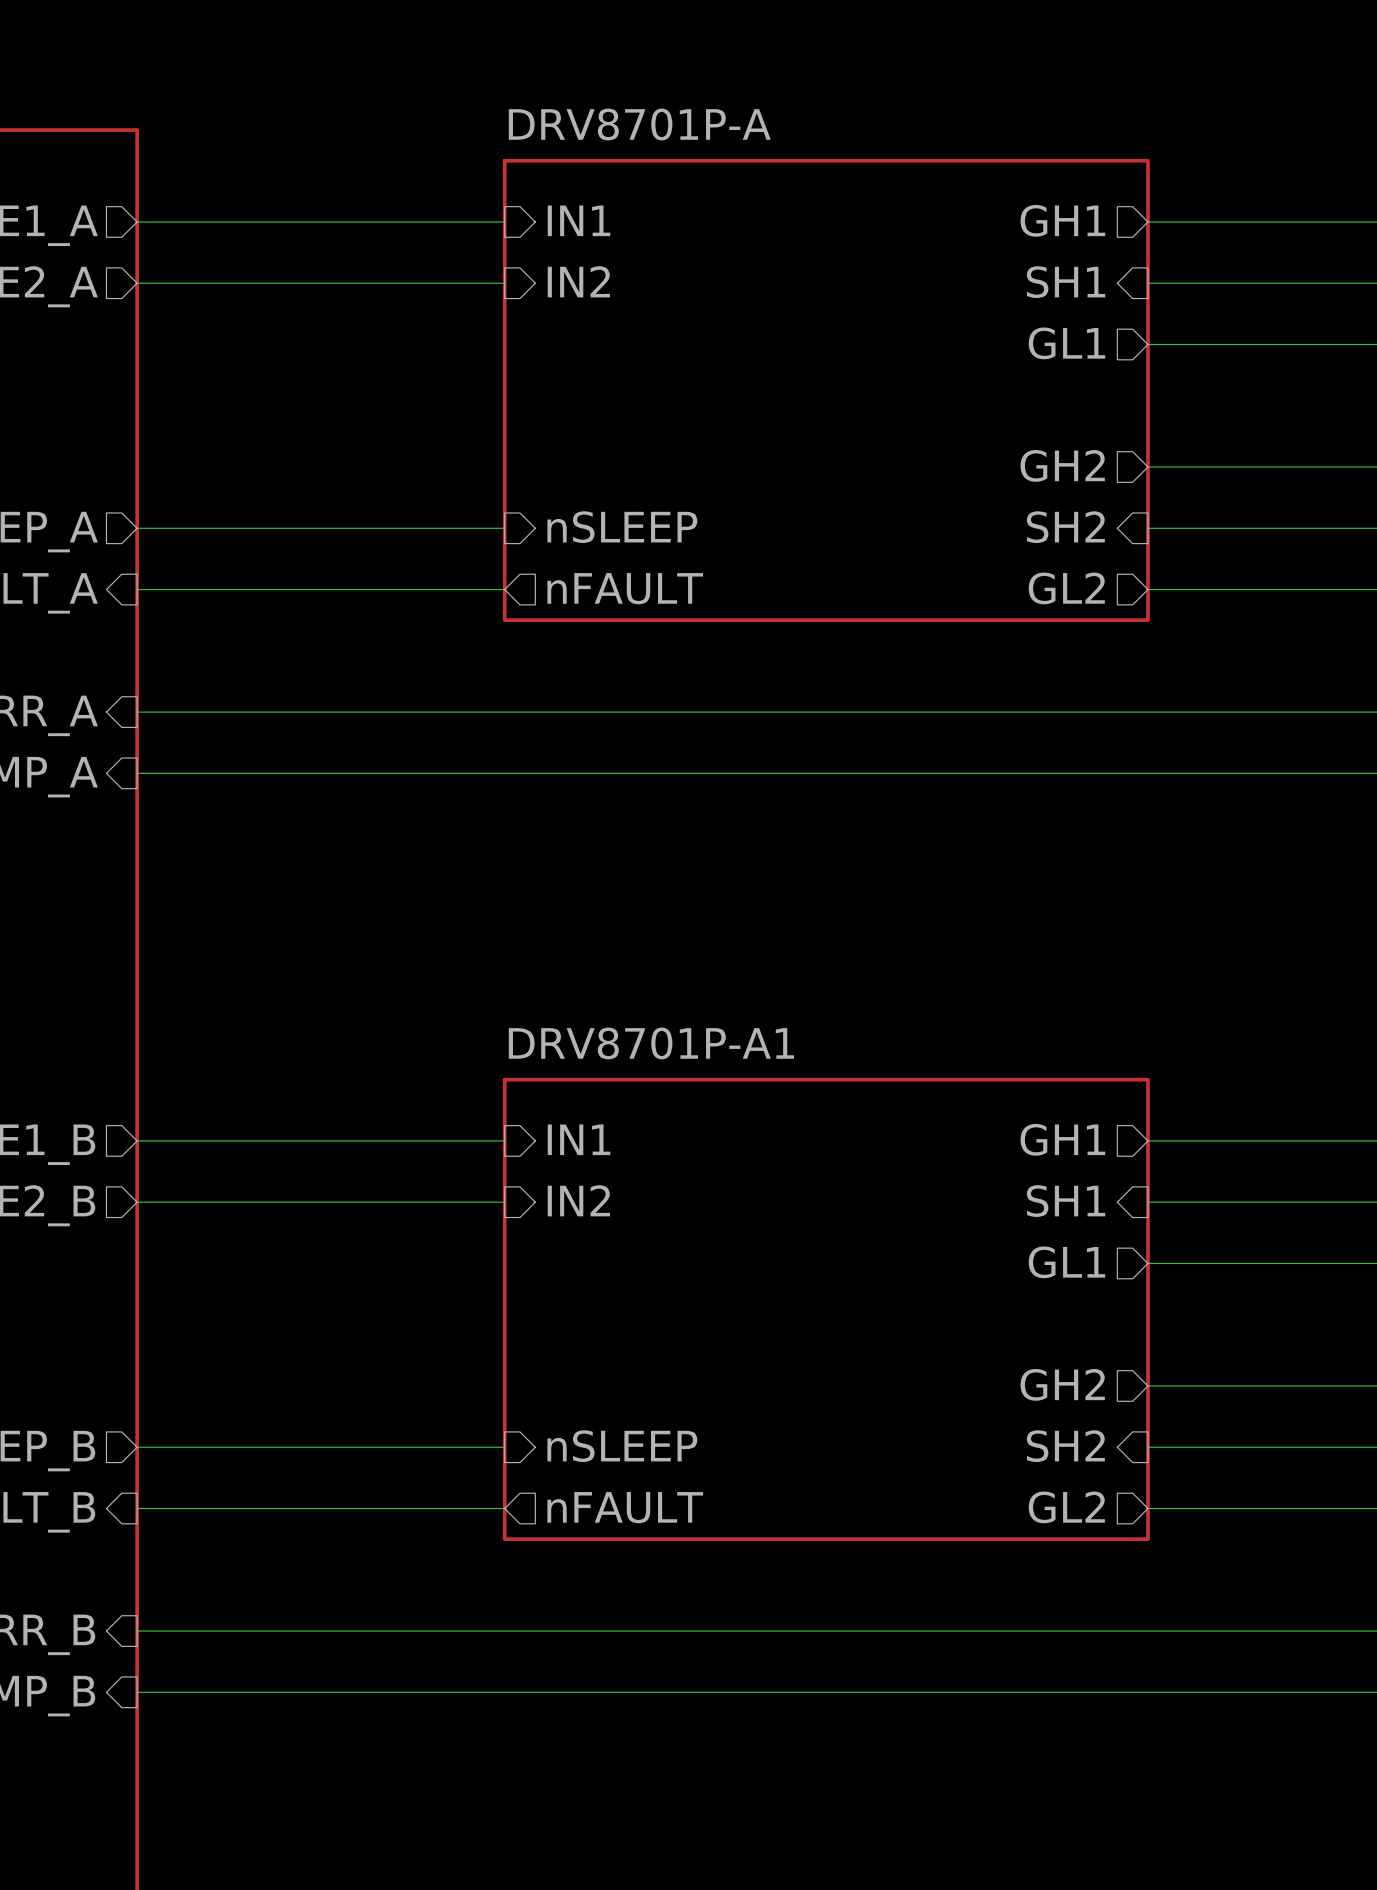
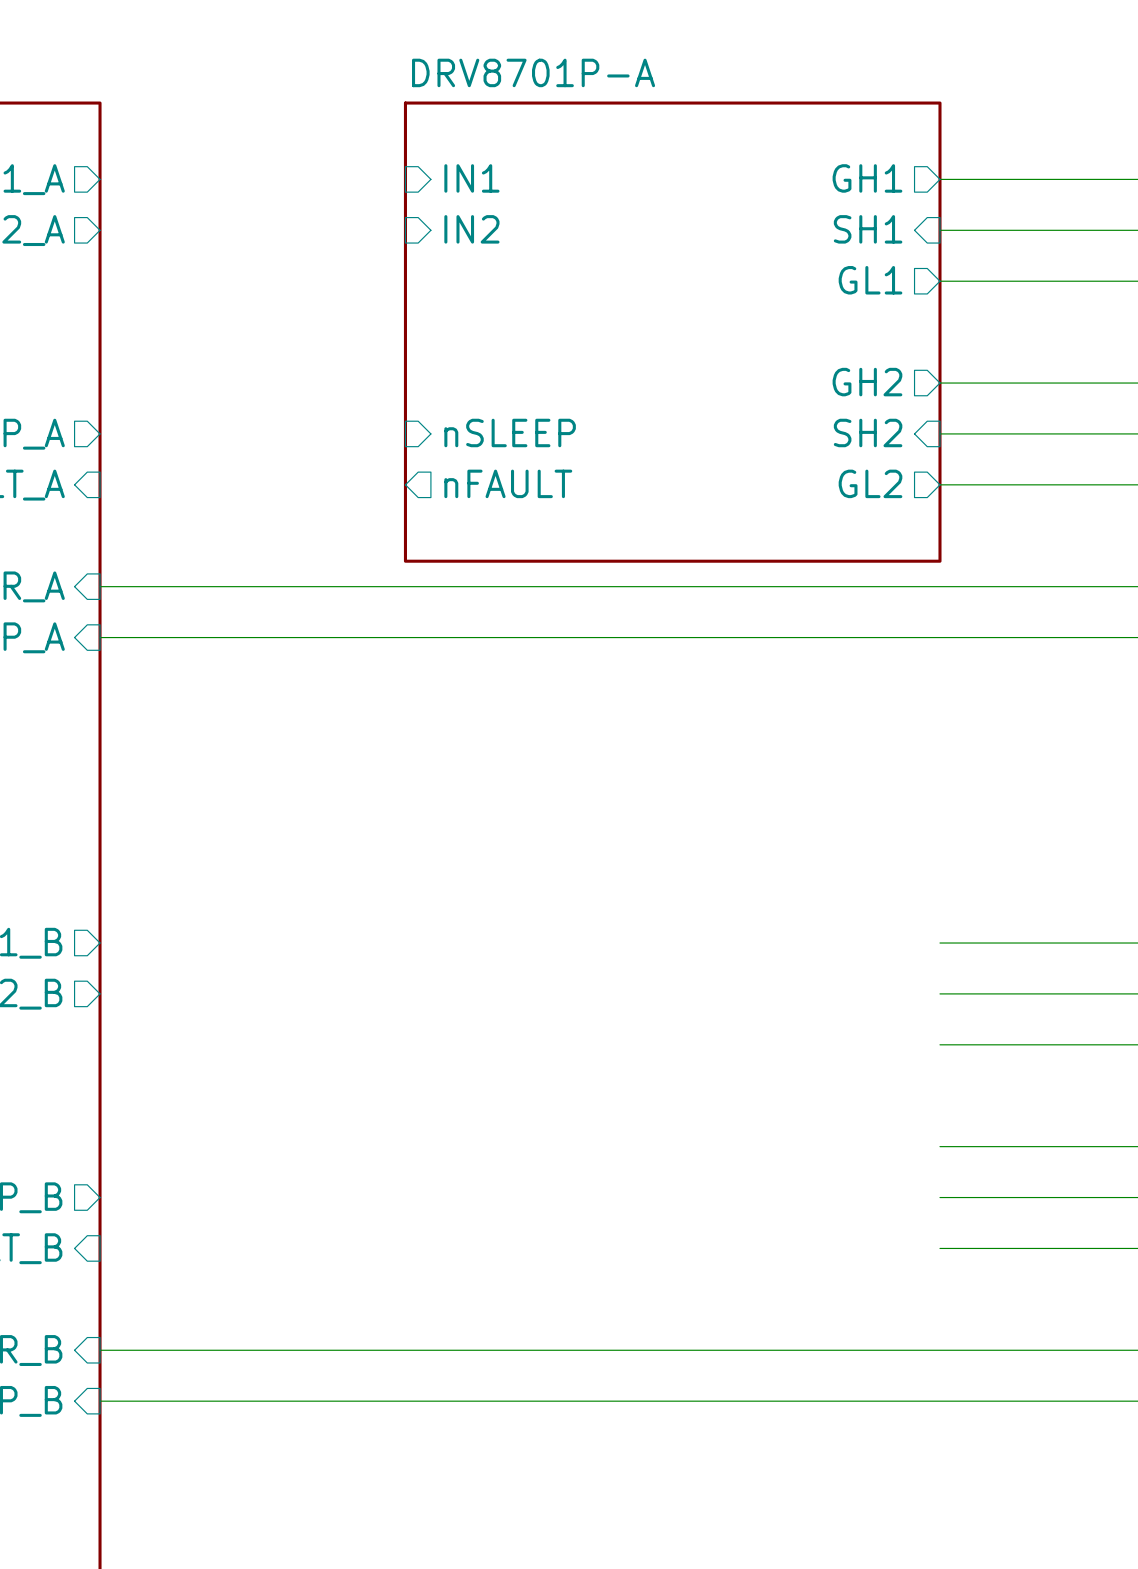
sheet DRV8701P-A shape: [502, 158, 1150, 623] -> [403, 101, 942, 563]
wire: (137, 221) (504, 221) -> none
wire: (137, 283) (504, 283) -> none
wire: (137, 528) (504, 528) -> none
wire: (137, 589) (504, 589) -> none
sheet pin: IN1 (579, 1139) -> none
sheet pin: GH1 (1062, 1139) -> none
wire: (137, 1140) (504, 1140) -> none
sheet pin: IN2 (578, 1200) -> none
sheet pin: SH1 (1066, 1201) -> none
wire: (137, 1202) (504, 1202) -> none
sheet pin: GL1 (1066, 1262) -> none
sheet DRV8701P-A1: (826, 1309) -> none
sheet pin: GH2 (1062, 1384) -> none
sheet pin: nSLEEP (622, 1446) -> none
sheet pin: SH2 (1065, 1446) -> none
wire: (137, 1447) (504, 1447) -> none
sheet pin: nFAULT (625, 1507) -> none
sheet pin: GL2 (1066, 1507) -> none
wire: (137, 1508) (504, 1508) -> none

